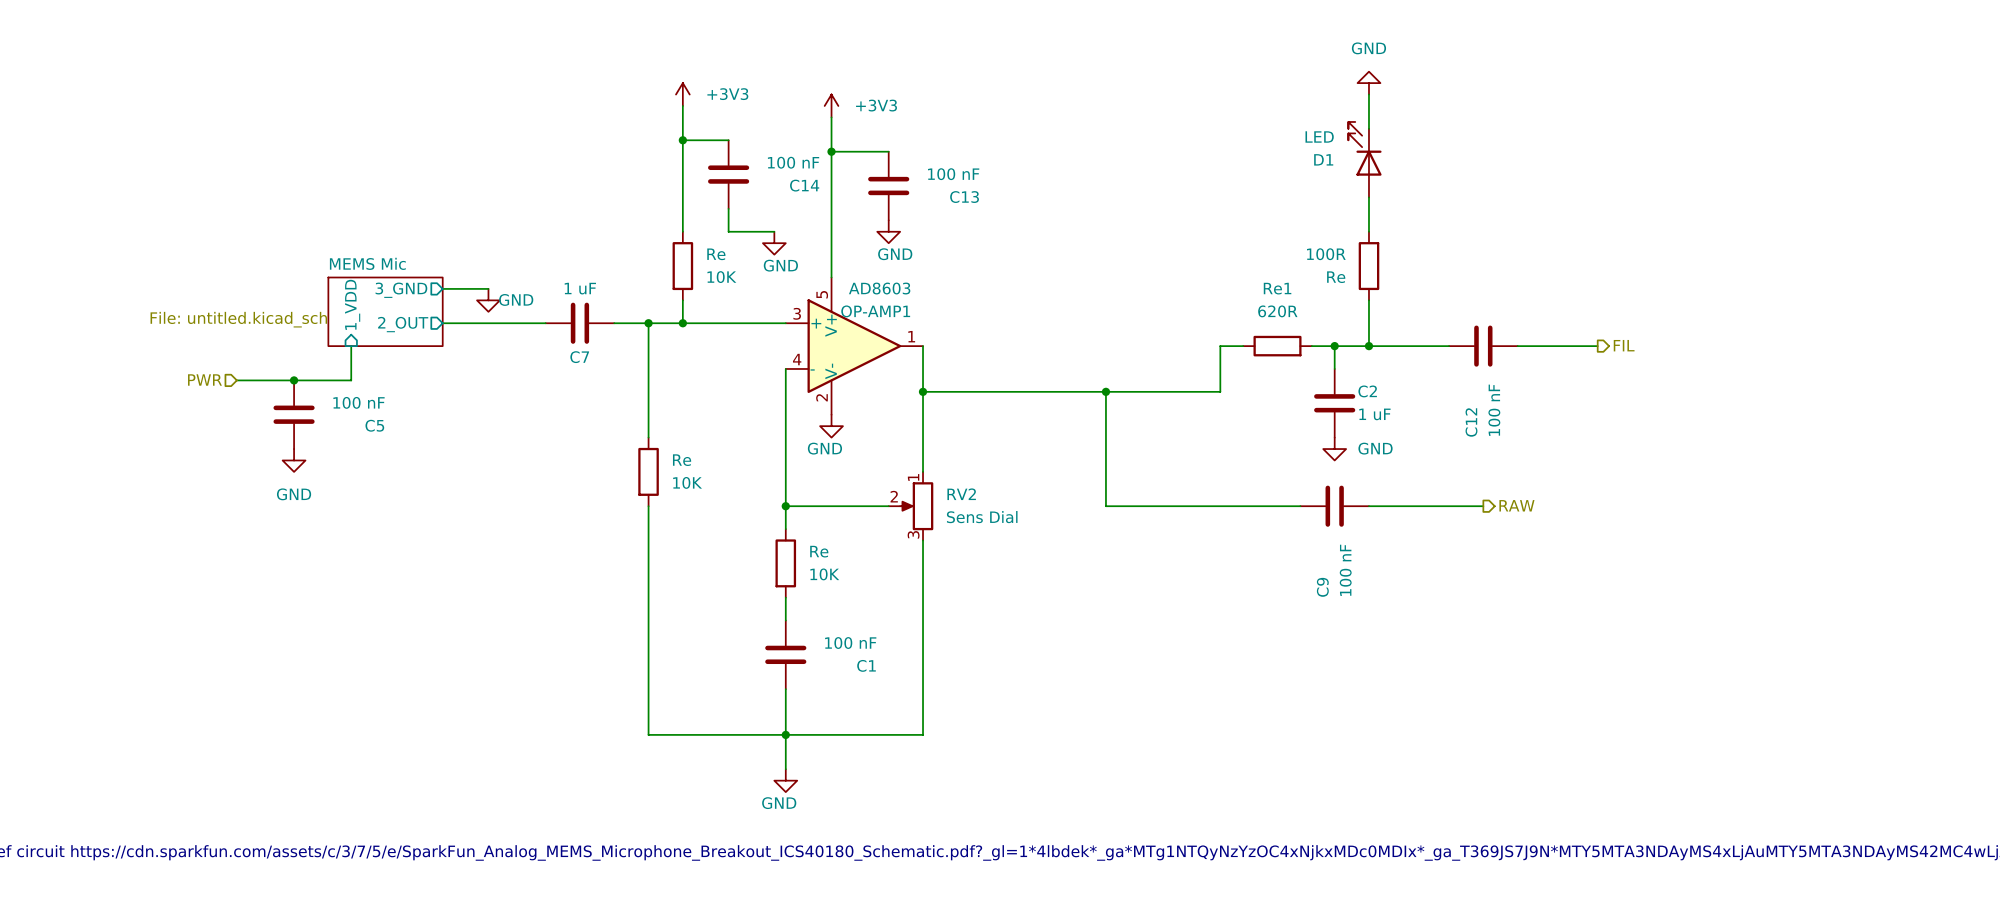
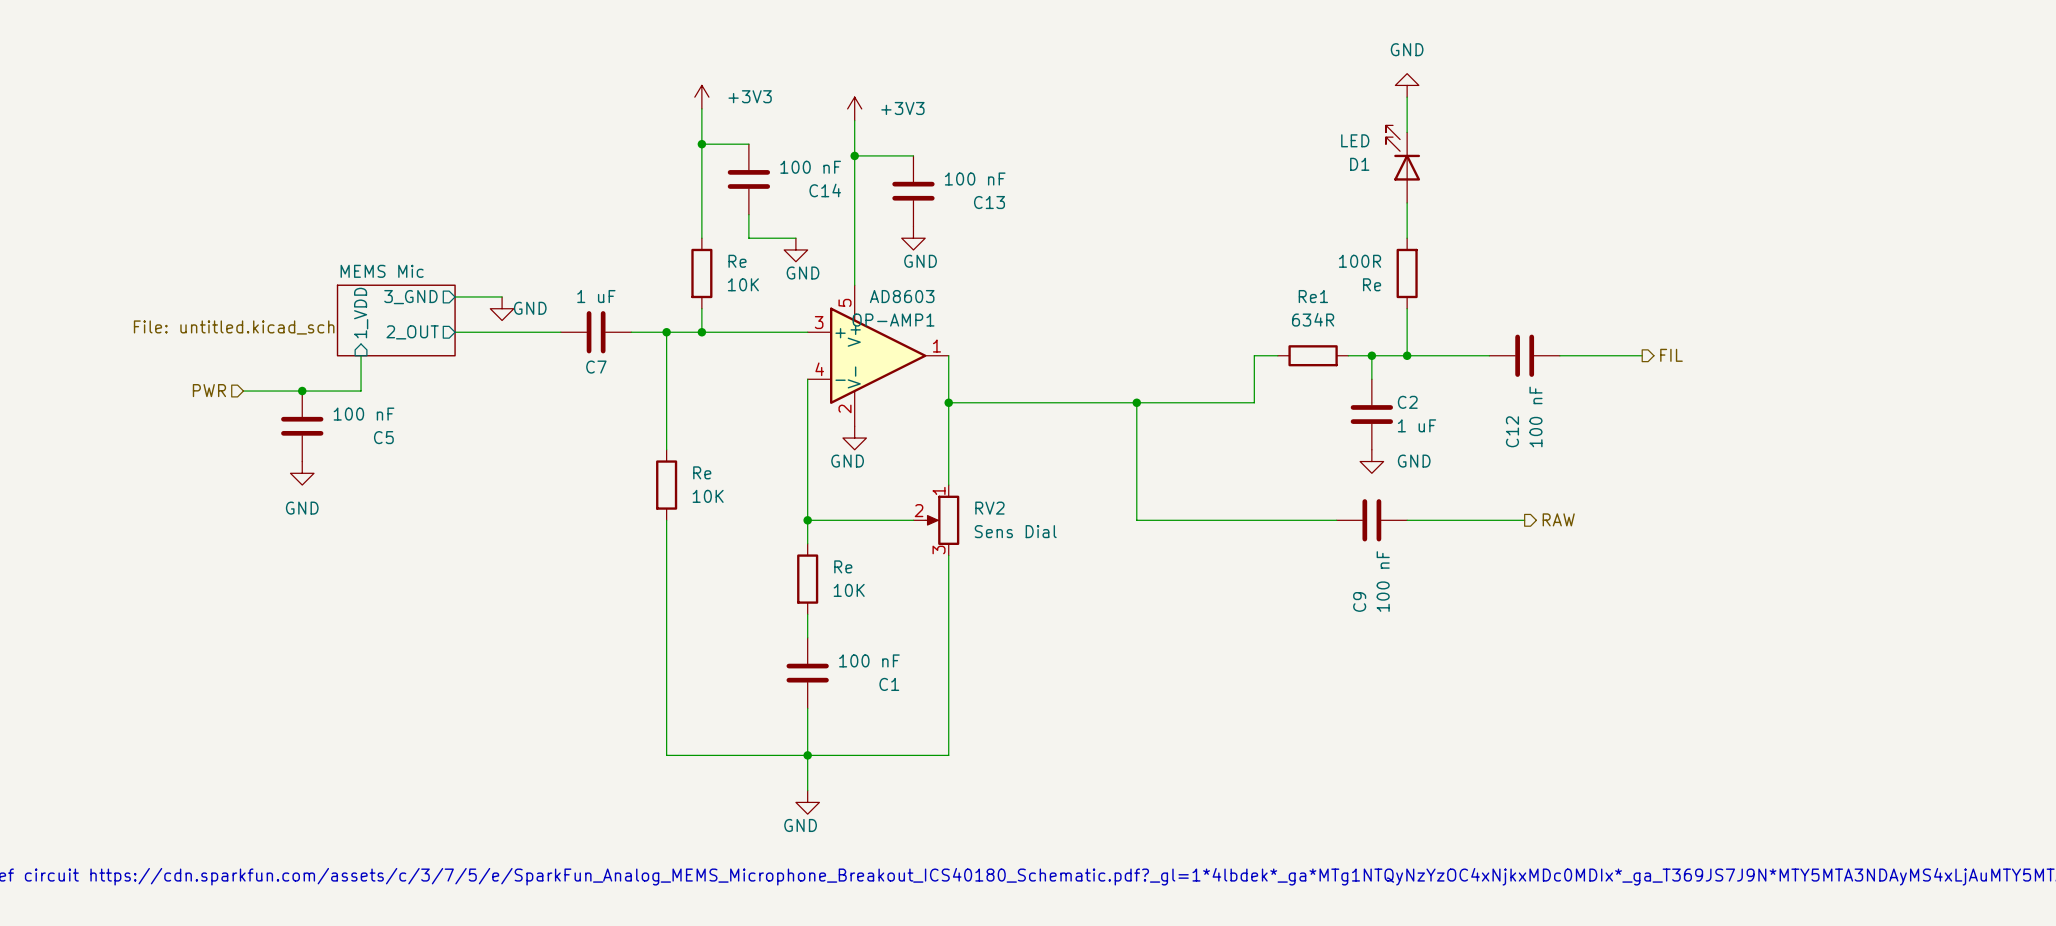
Re1 value: 620R (1277, 311) -> 634R (1313, 319)

